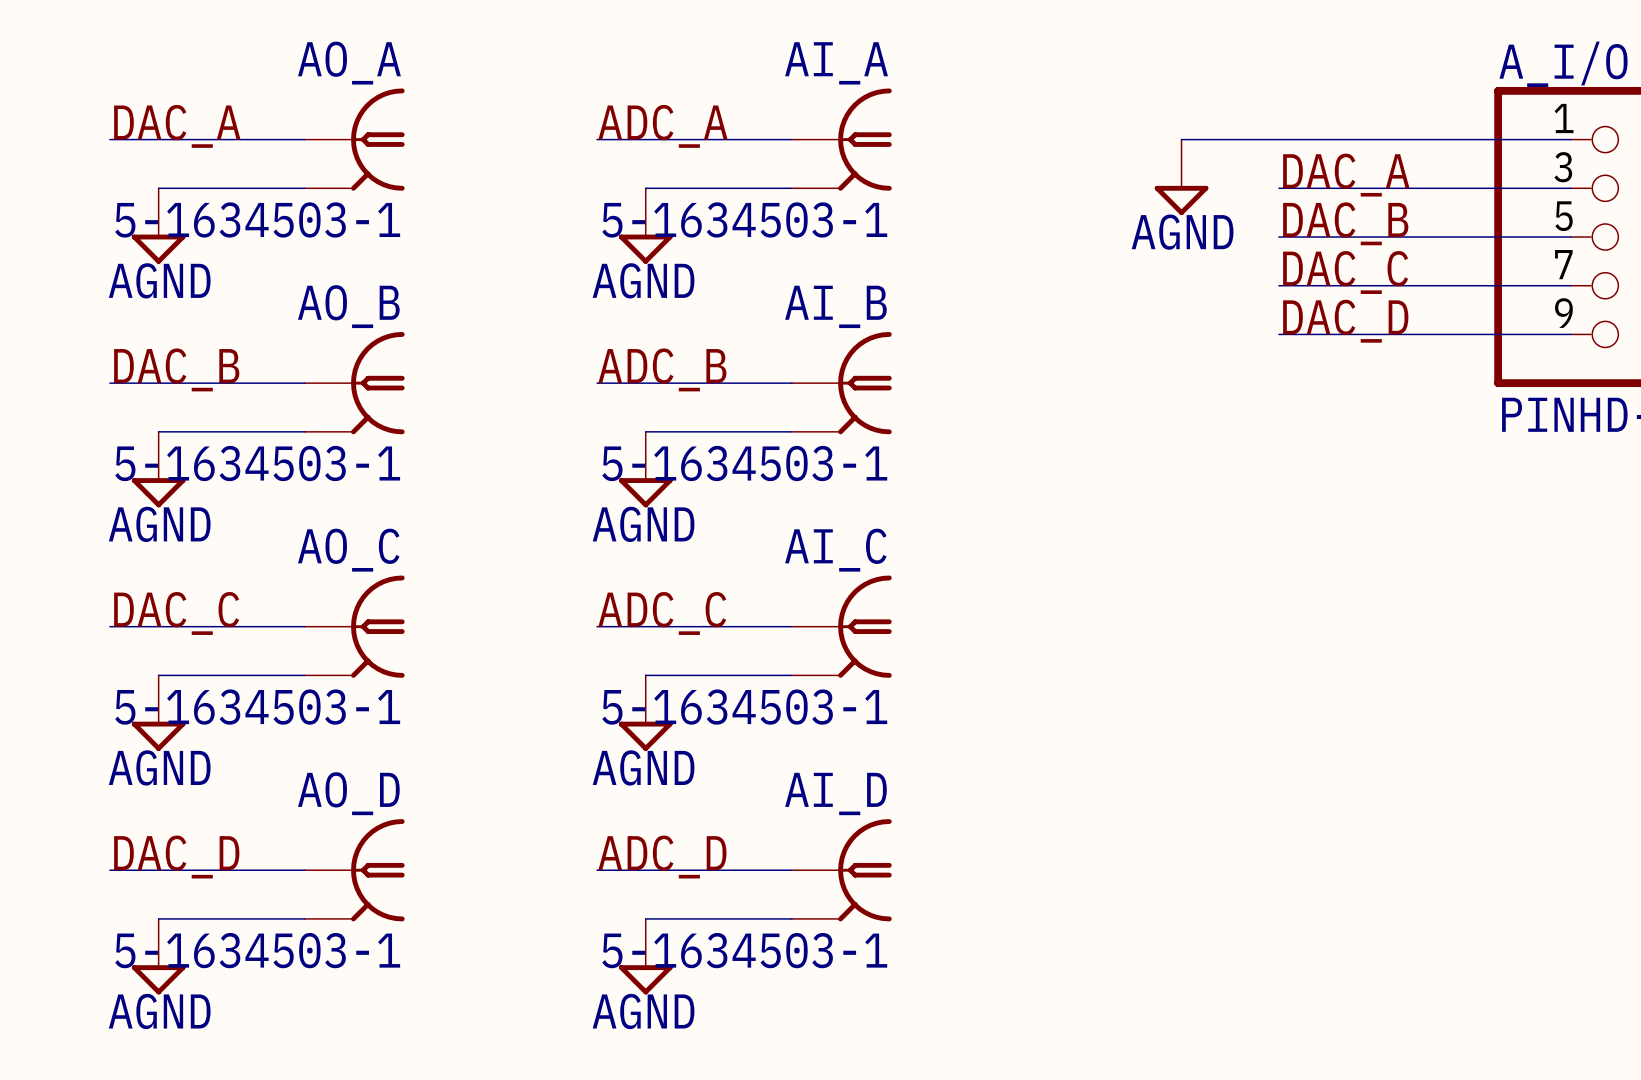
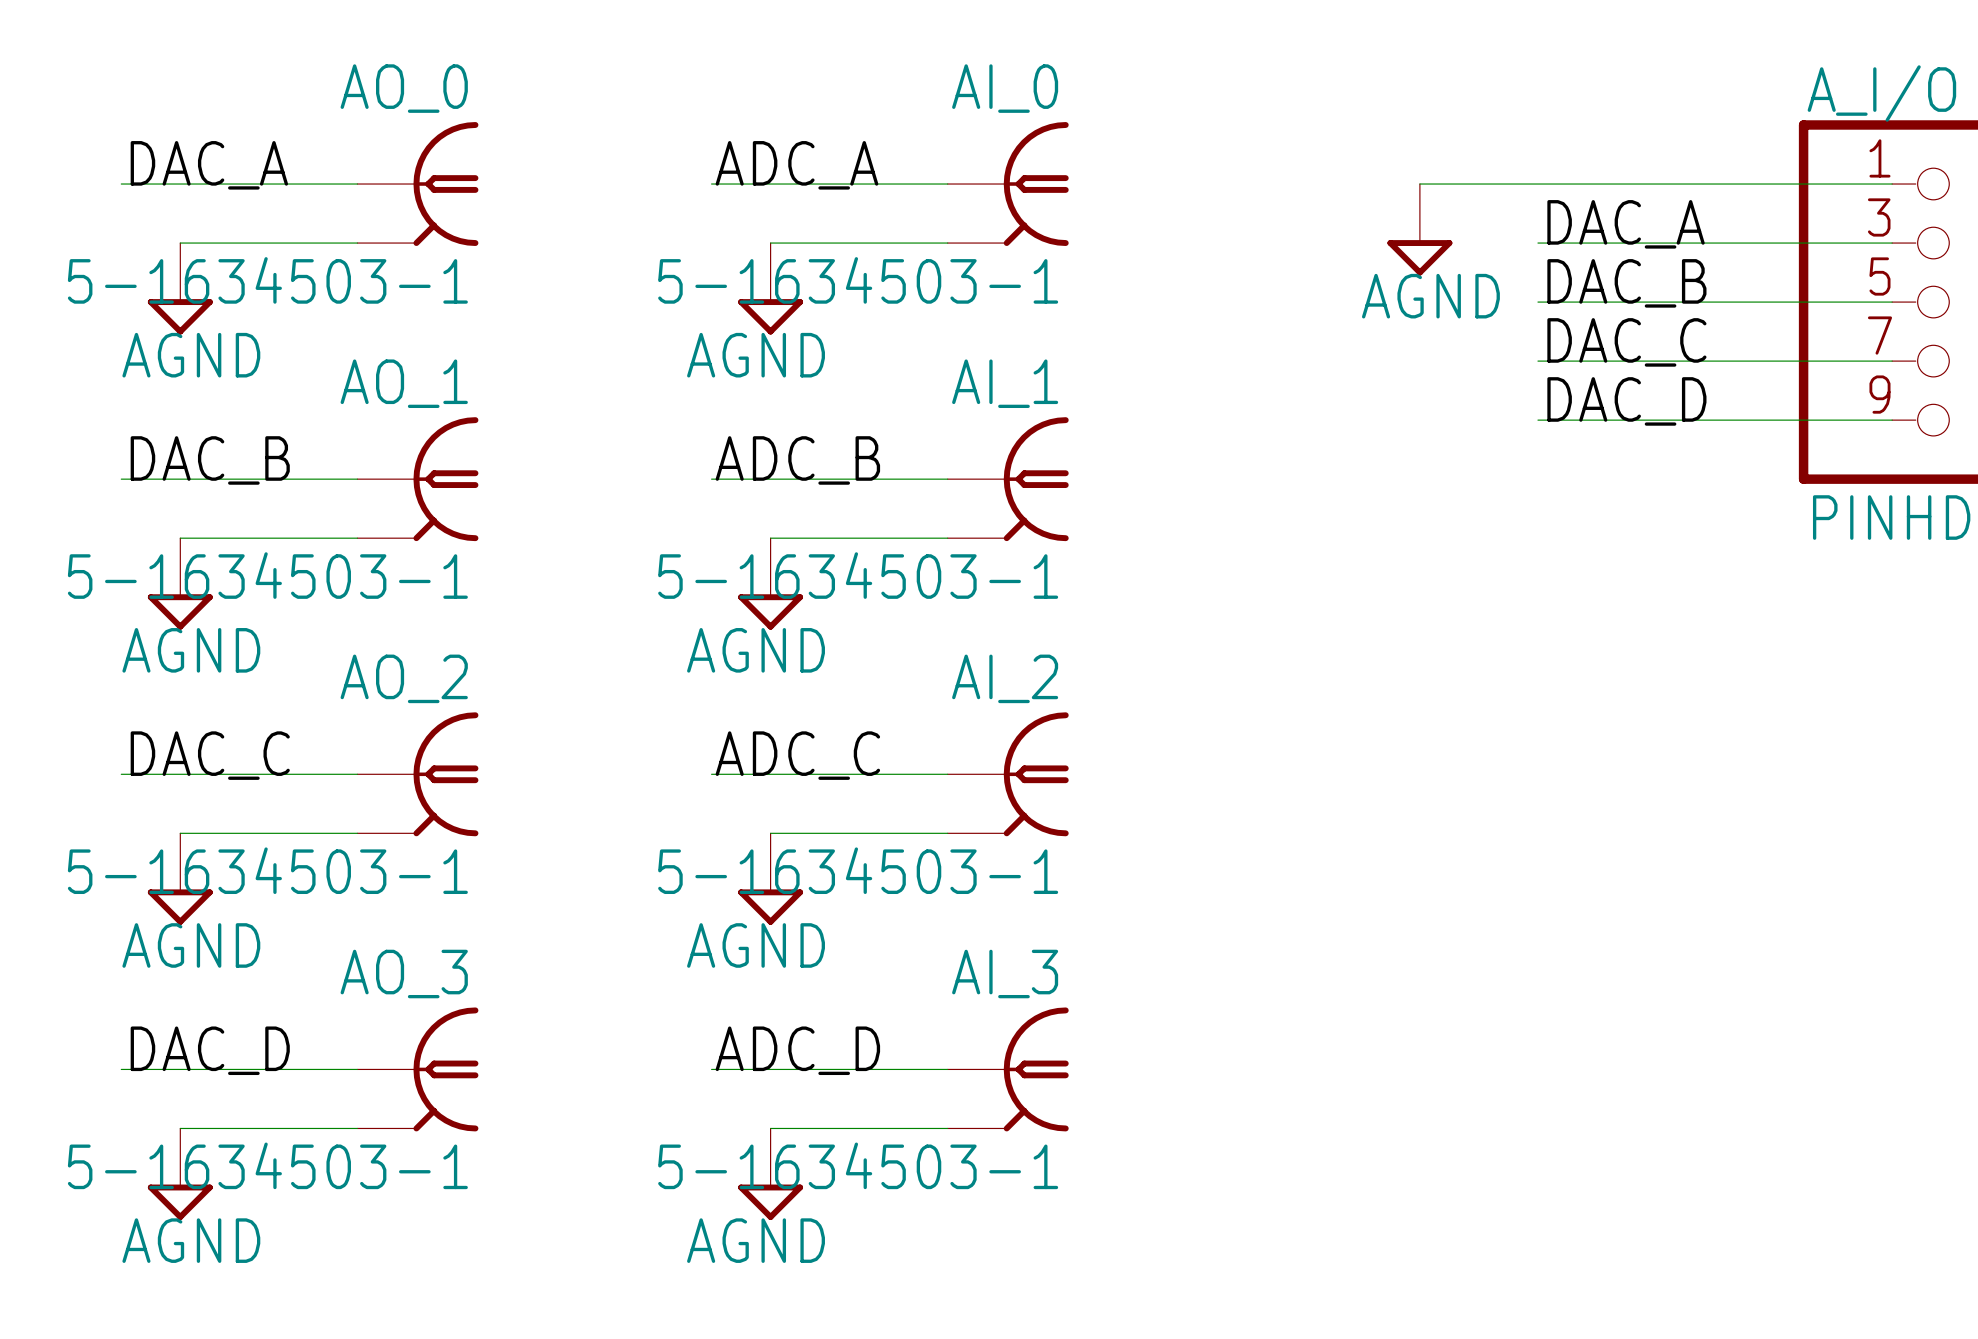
AO_A name: AO_A (349, 63) -> AO_0 (404, 88)
AI_A name: AI_A (836, 63) -> AI_0 (1005, 88)
AO_B name: AO_B (348, 306) -> AO_1 (404, 383)
AI_B name: AI_B (835, 306) -> AI_1 (1005, 383)
AO_C name: AO_C (348, 550) -> AO_2 (404, 678)
AI_C name: AI_C (835, 550) -> AI_2 (1005, 678)
AO_D name: AO_D (348, 793) -> AO_3 (404, 974)
AI_D name: AI_D (835, 793) -> AI_3 (1005, 974)

